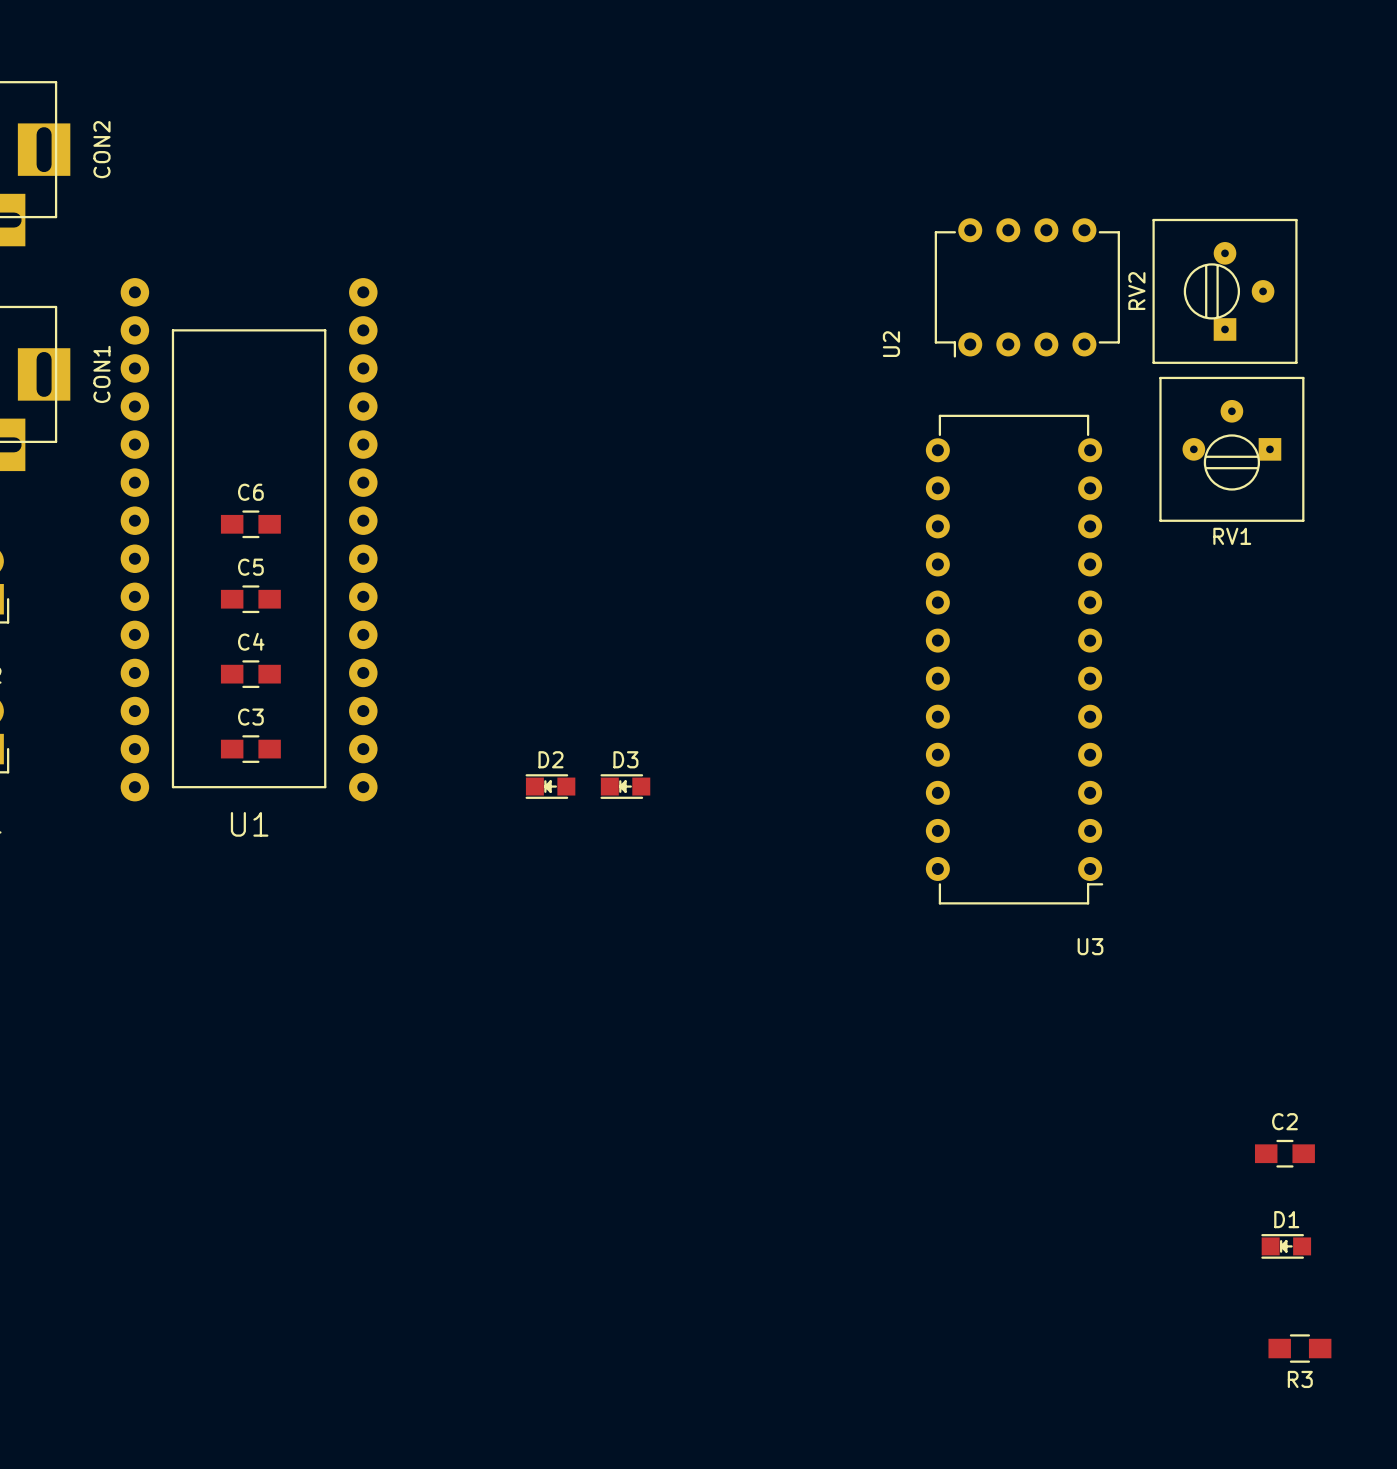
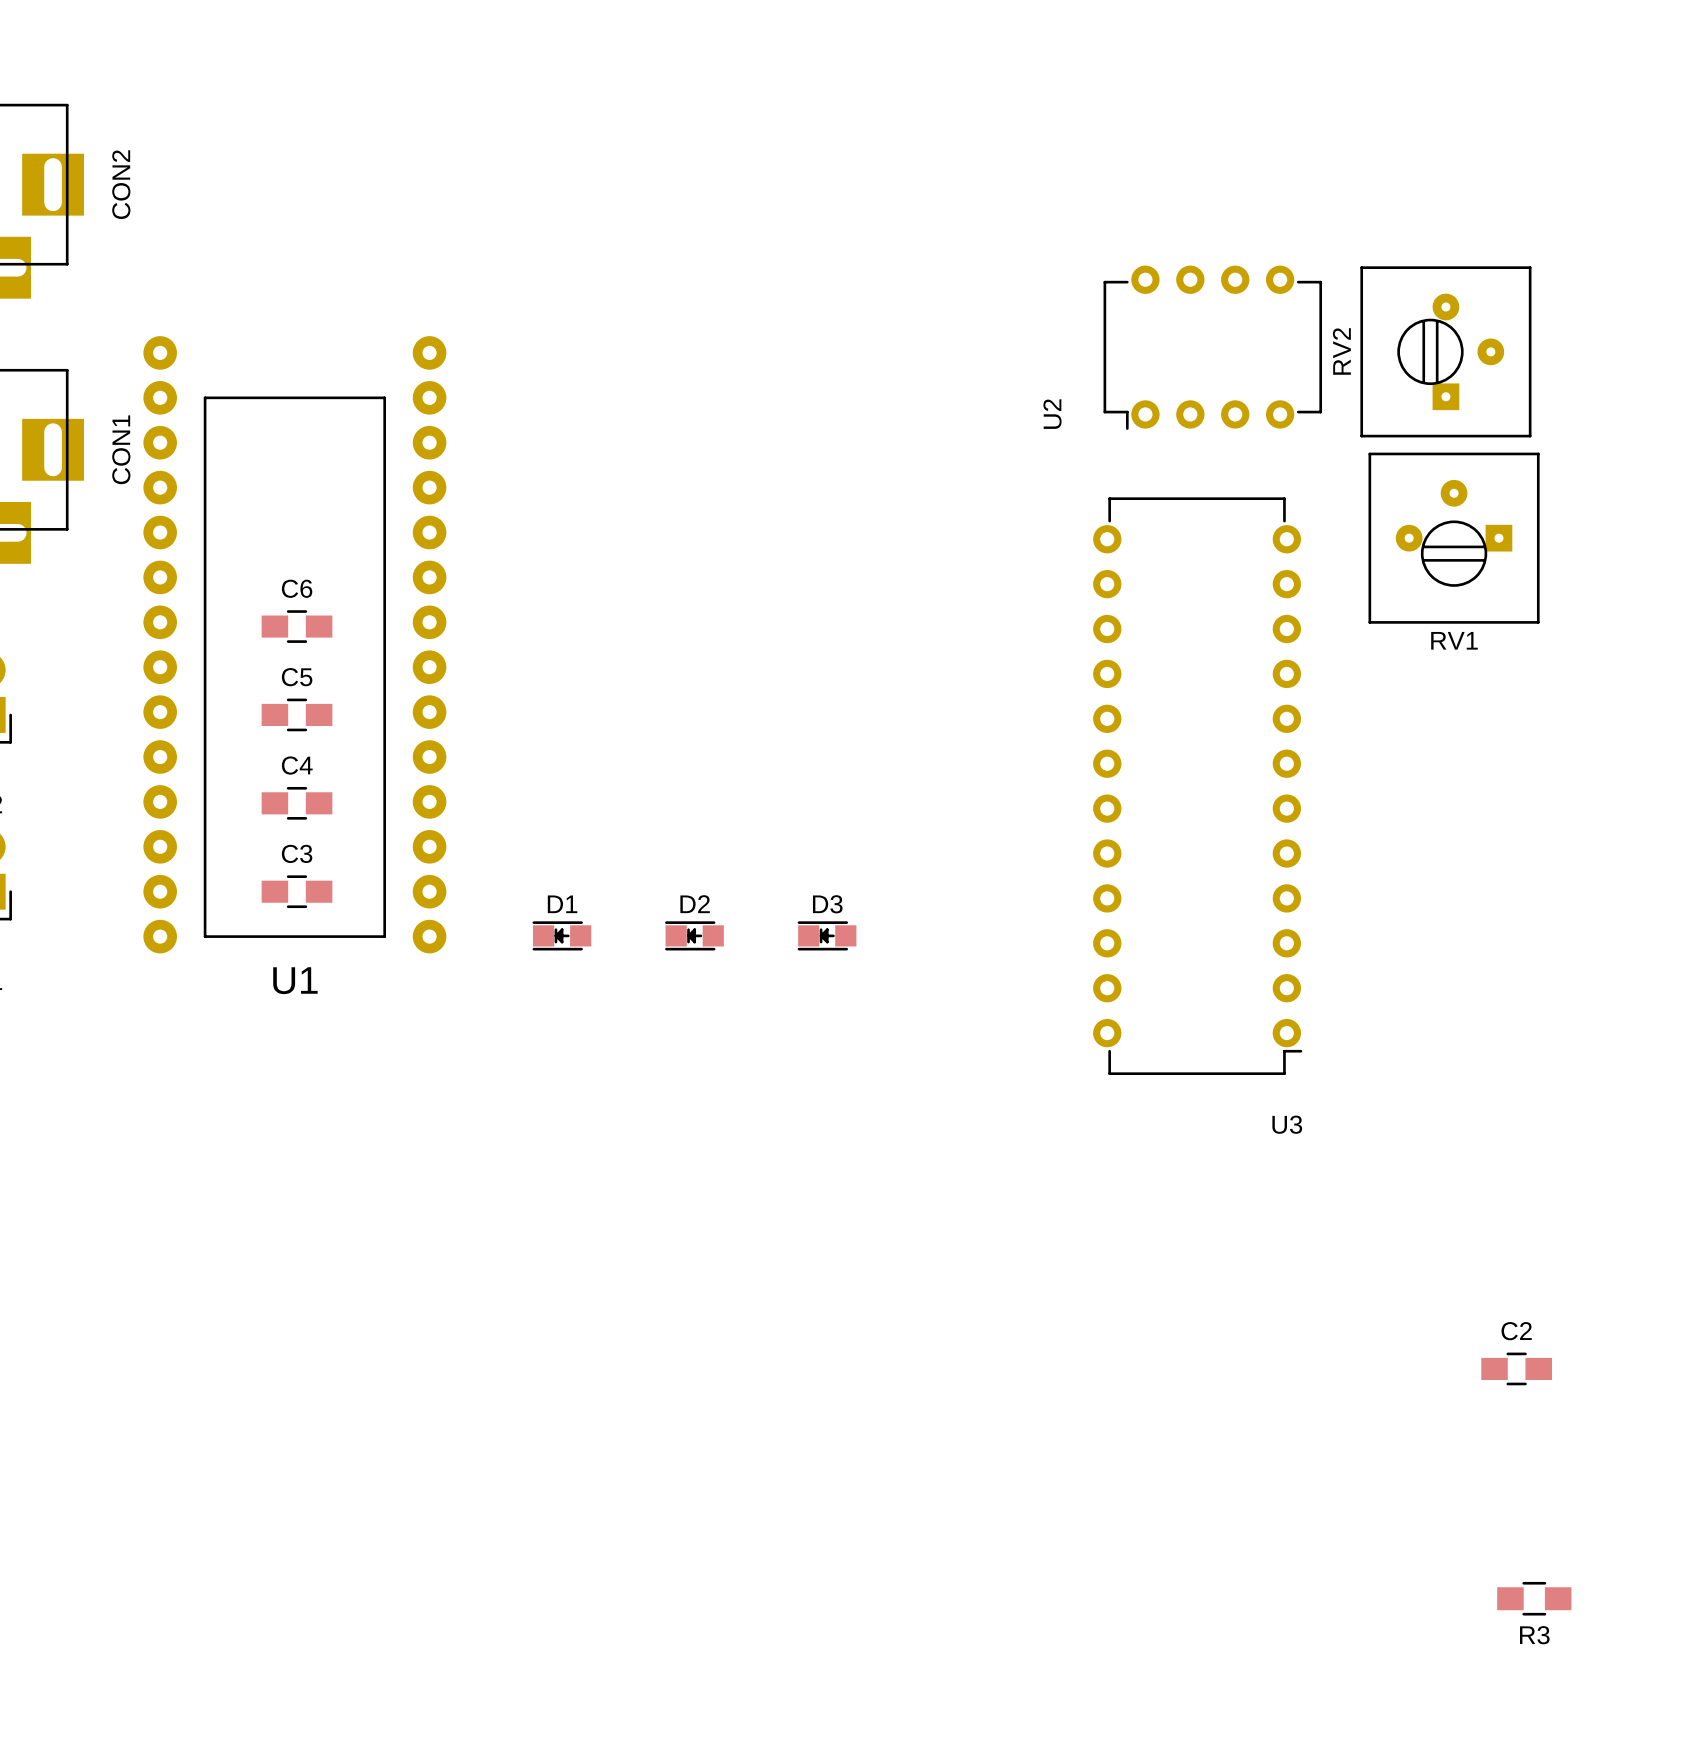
D2 position: (550, 786) -> (694, 935)
D3 position: (625, 786) -> (827, 935)
D1 position: (1286, 1246) -> (561, 935)

